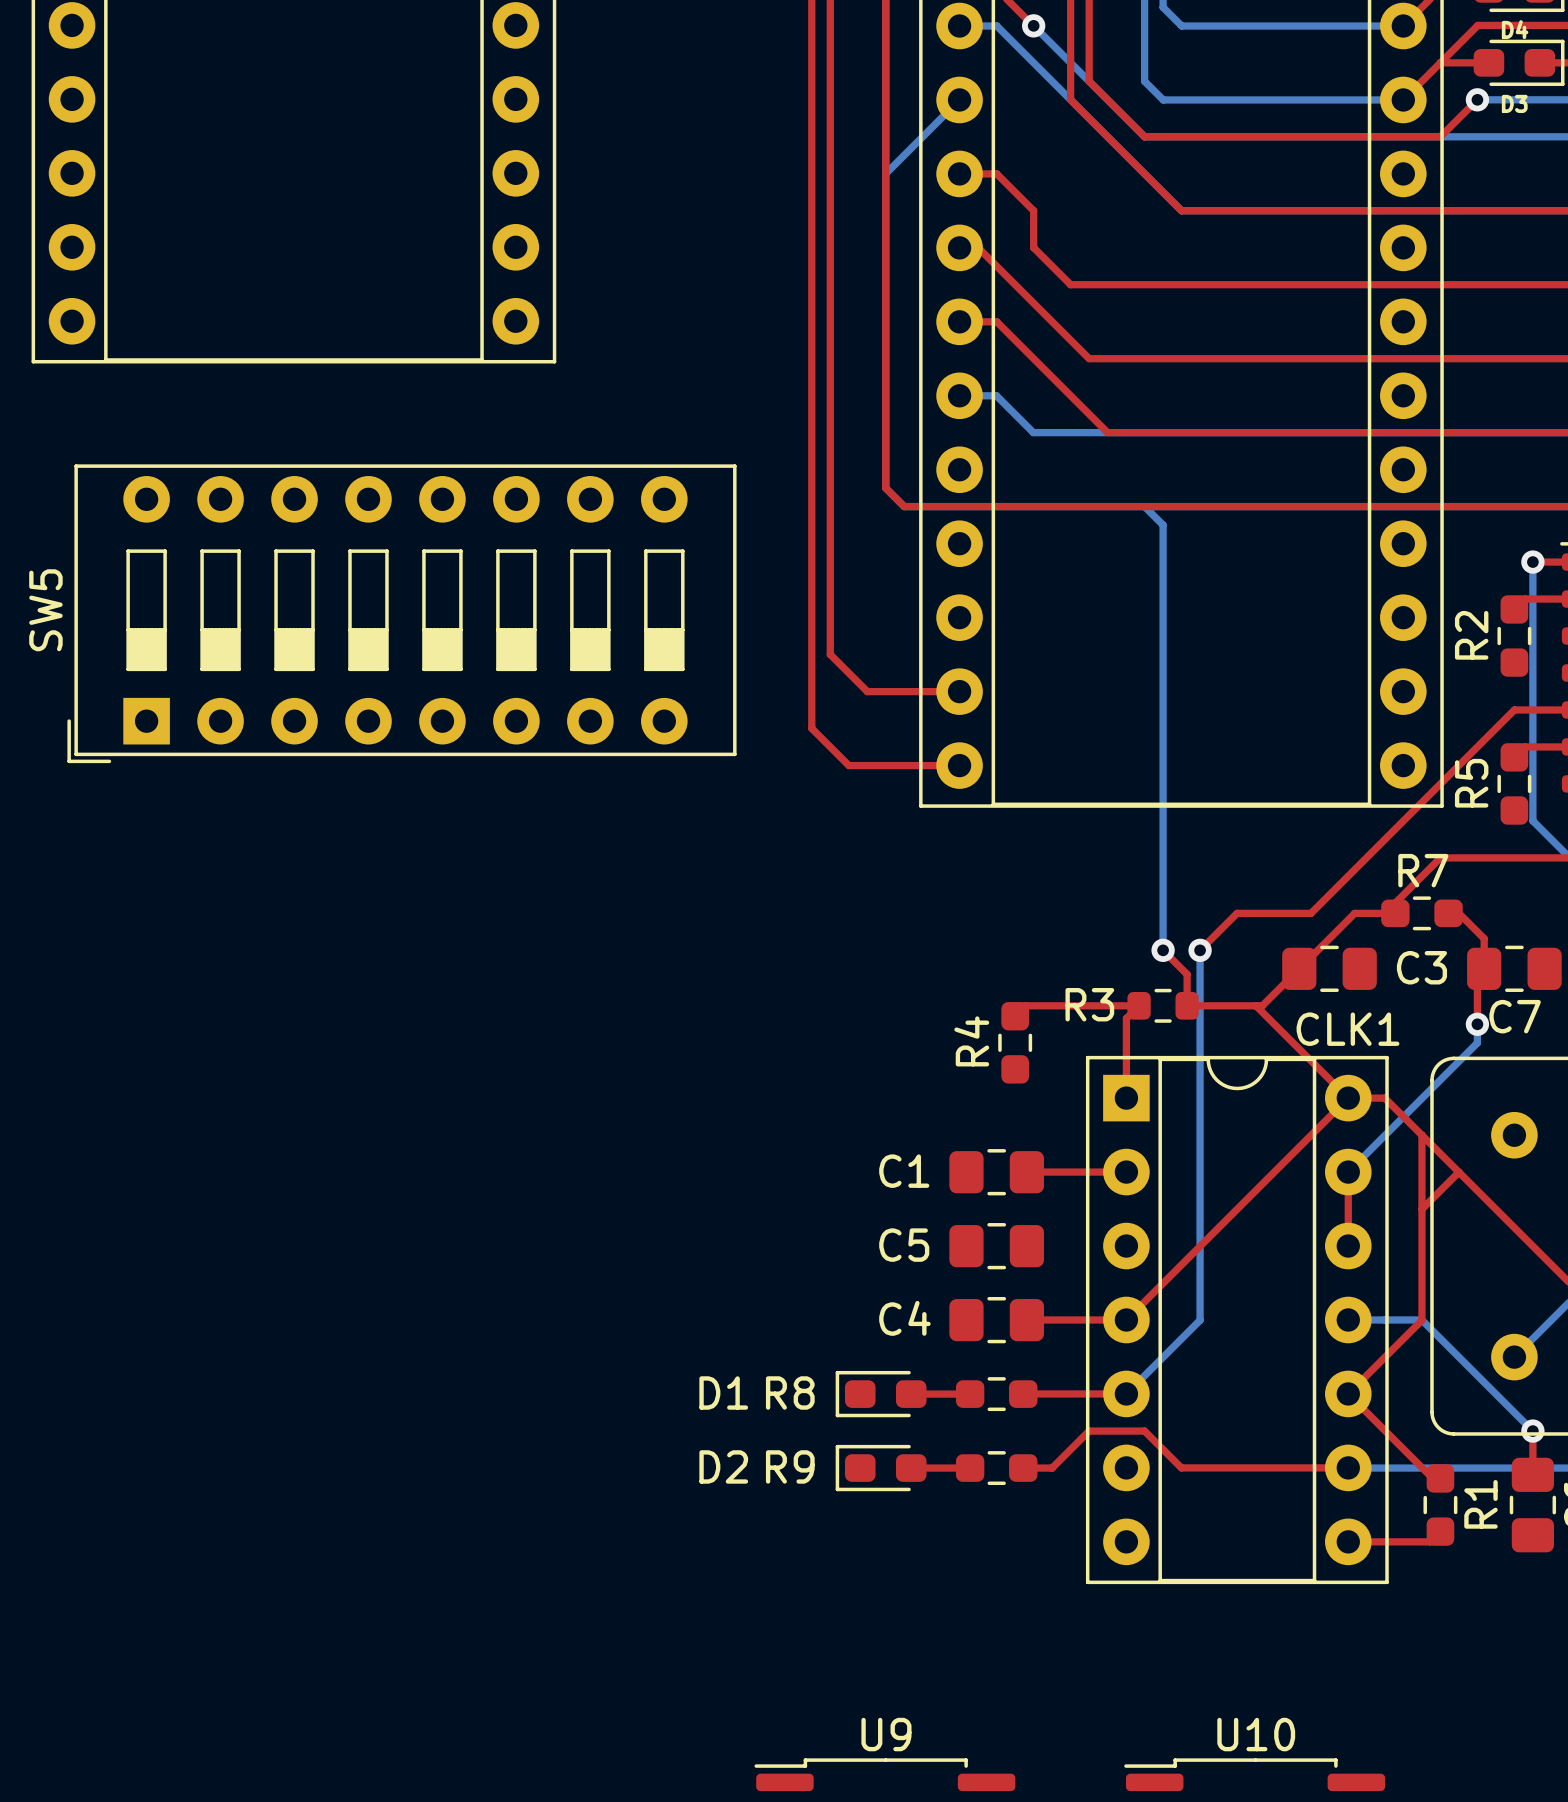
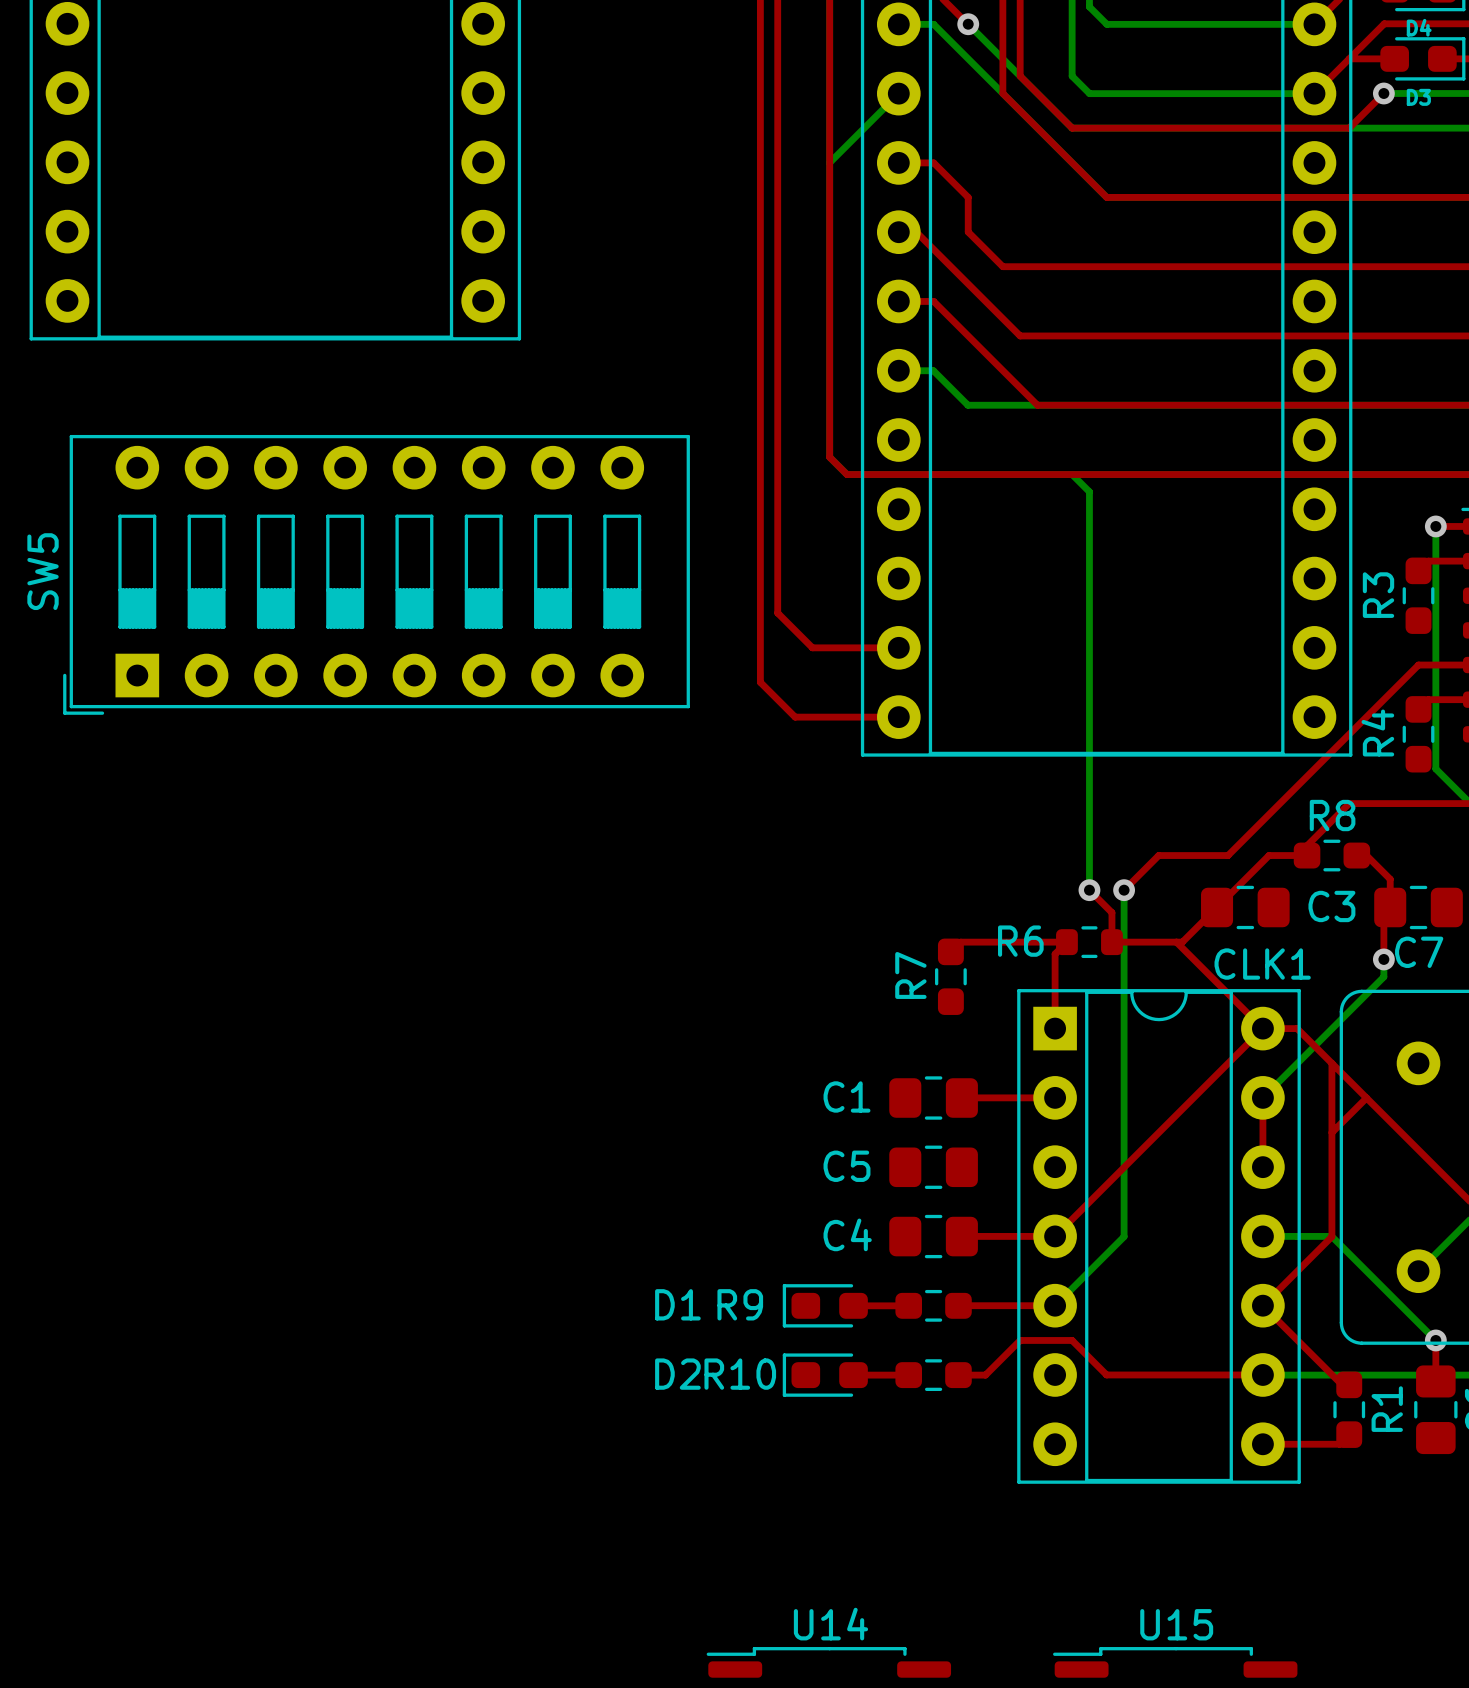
R2 name: R2 (1471, 635) -> R3 (1378, 595)
R5 name: R5 (1471, 783) -> R4 (1377, 733)
R7 name: R7 (1423, 870) -> R8 (1332, 815)
R3 name: R3 (1089, 1004) -> R6 (1020, 941)
R4 name: R4 (971, 1041) -> R7 (910, 975)
R8 name: R8 (790, 1393) -> R9 (740, 1304)
R9 name: R9 (790, 1466) -> R10 (740, 1374)
U9 name: U9 (886, 1734) -> U14 (830, 1624)
U10 name: U10 (1256, 1734) -> U15 (1176, 1624)

